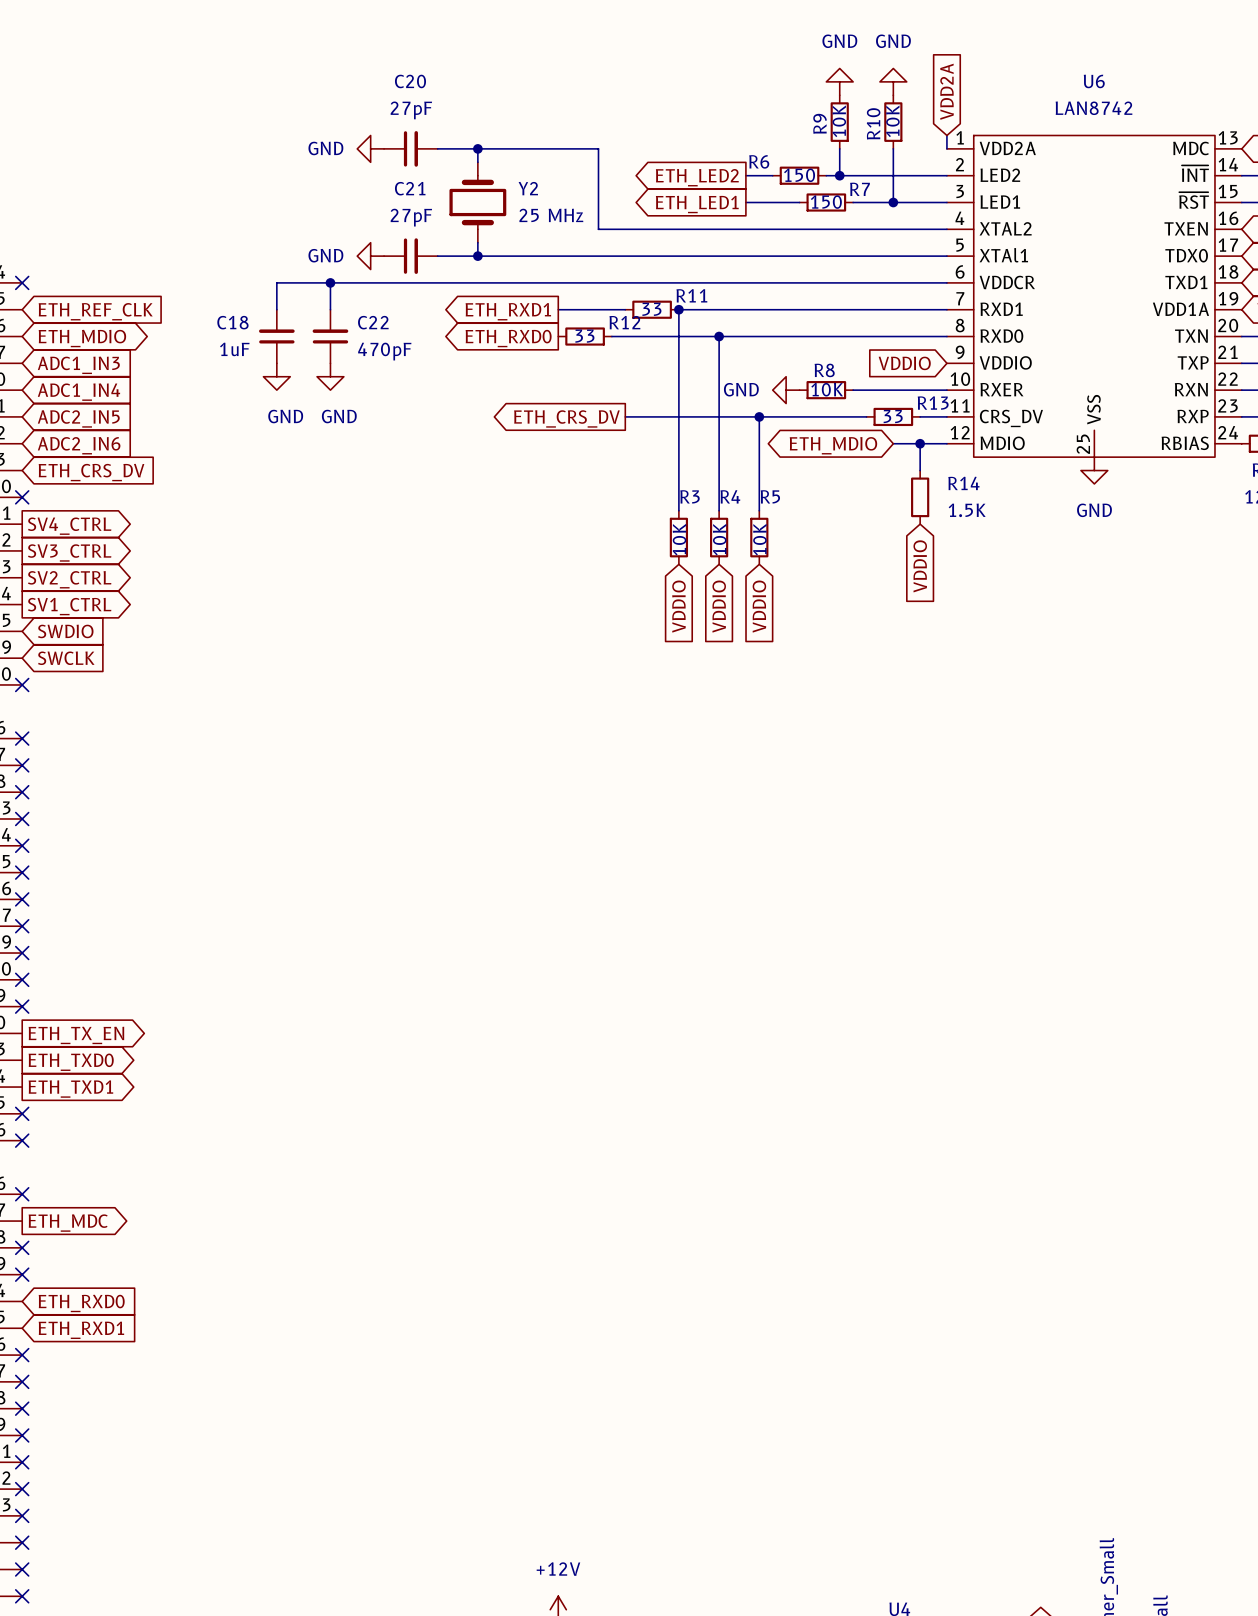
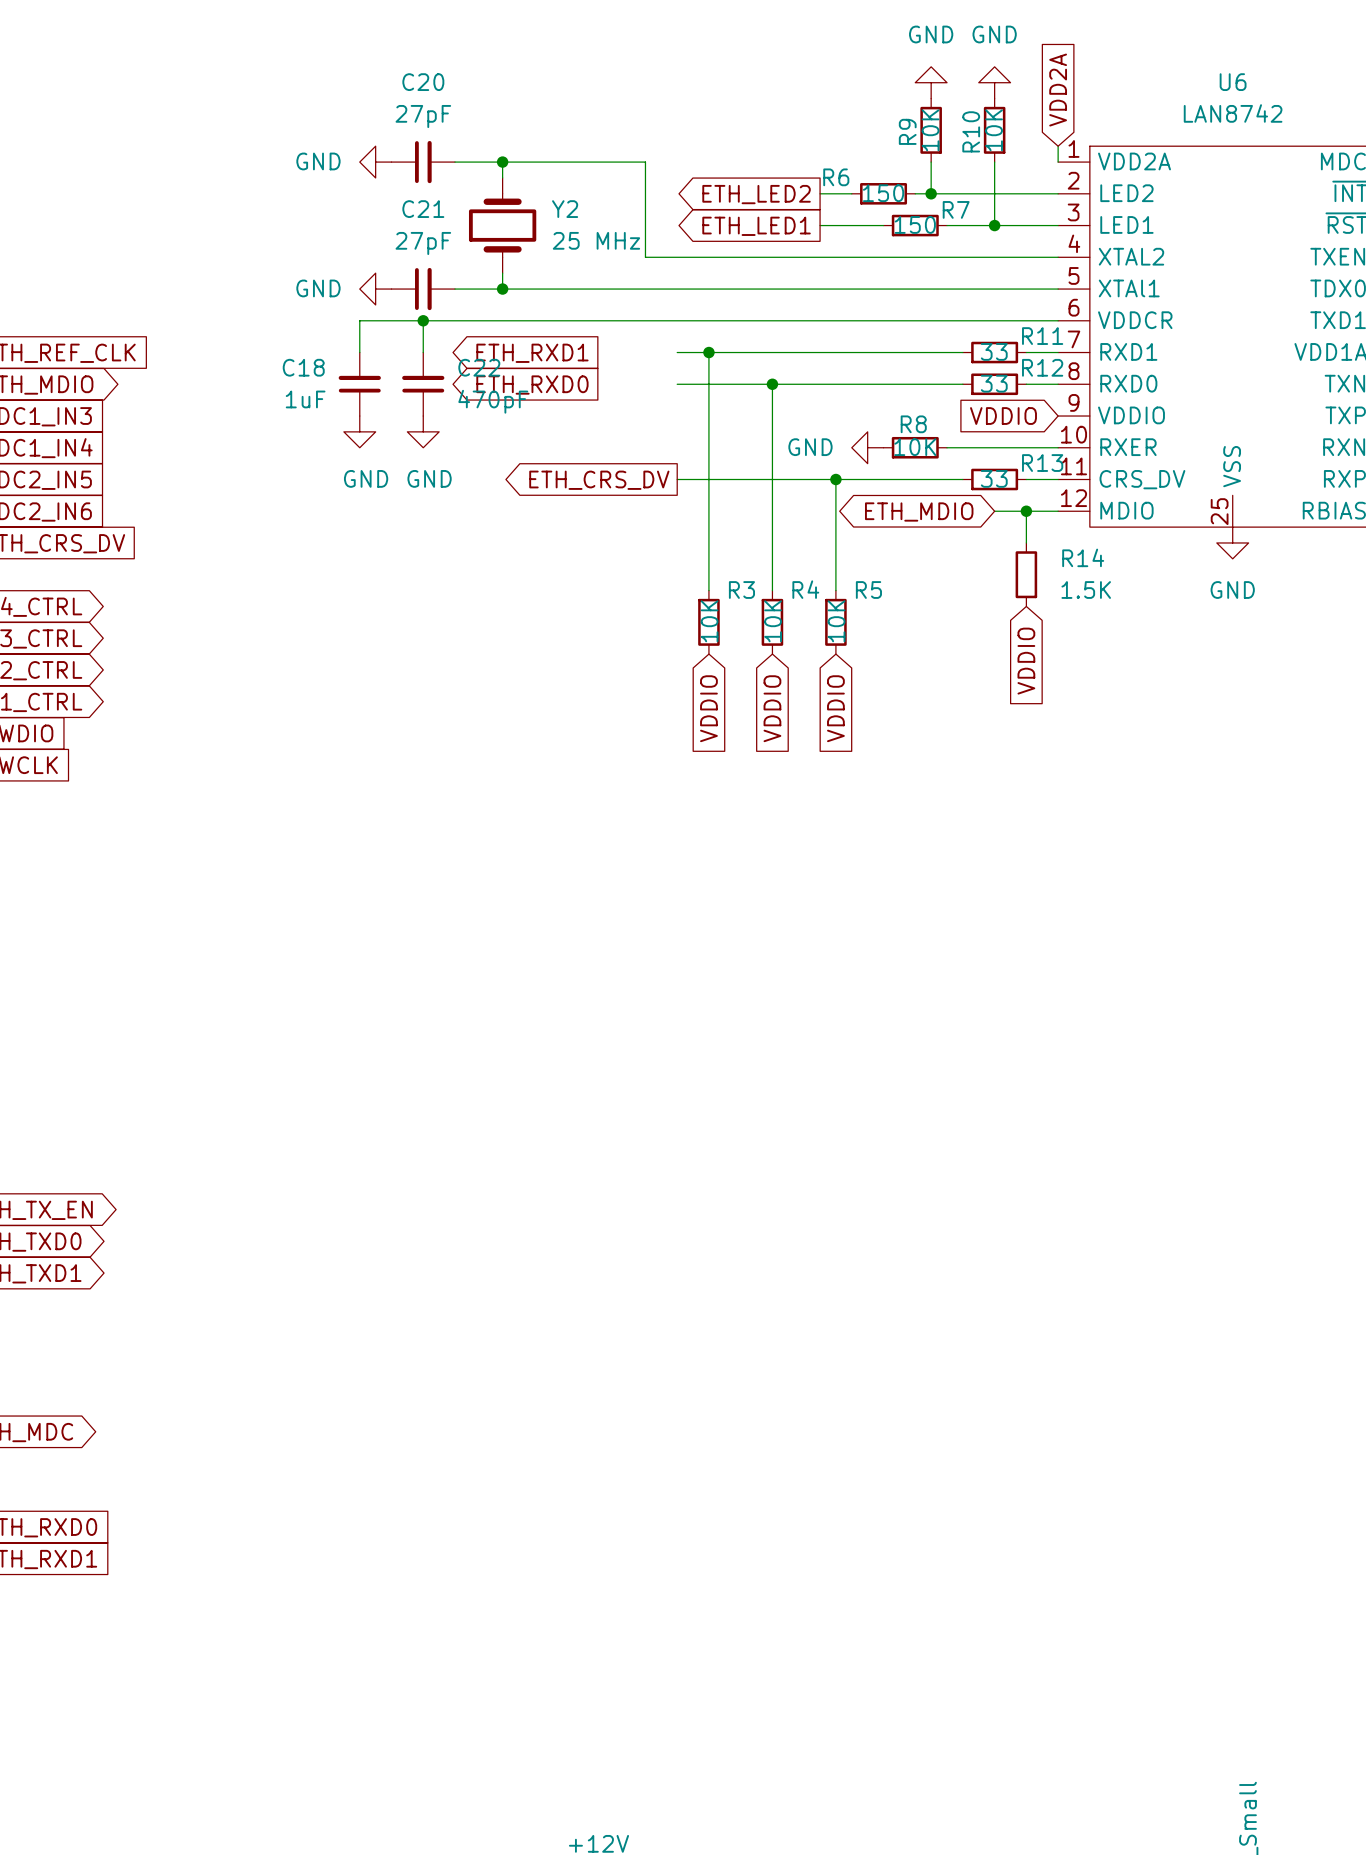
wire: (330, 282) (330, 309) -> (423, 320) (423, 352)
junction: (330, 282) -> none
wire: (357, 282) (276, 282) (276, 309) -> (359, 320) (359, 352)
junction: none -> (423, 320)
wire: (558, 309) (625, 309) -> (740, 352) (677, 352)
junction: none -> (708, 352)
R11 position: (652, 309) -> (994, 352)
wire: (678, 309) (678, 510) -> (708, 352) (708, 590)
junction: (678, 309) -> none
wire: (866, 309) (920, 309) -> none
C18 position: (276, 336) -> (359, 384)
C22 position: (330, 336) -> (423, 384)
R12 position: (585, 336) -> (994, 384)
wire: (611, 336) (625, 336) -> none
wire: (719, 336) (719, 510) -> (772, 384) (772, 590)
junction position: (719, 336) -> (772, 384)
wire: (866, 336) (920, 336) -> none
power symbol: GND (276, 376) -> none
power symbol position: GND (330, 376) -> GND (359, 431)
power symbol: none -> GND (423, 431)
R3 name position: R3 (689, 496) -> R3 (741, 590)
R4 name position: R4 (730, 496) -> R4 (805, 589)
R5 name position: R5 (770, 496) -> R5 (868, 590)
R3 position: (678, 537) -> (708, 622)
R4 position: (719, 537) -> (772, 622)
global label: none -> VDDIO (708, 708)
global label: VDDIO (678, 606) -> none
global label: none -> VDDIO (772, 708)
global label: VDDIO (719, 606) -> none

